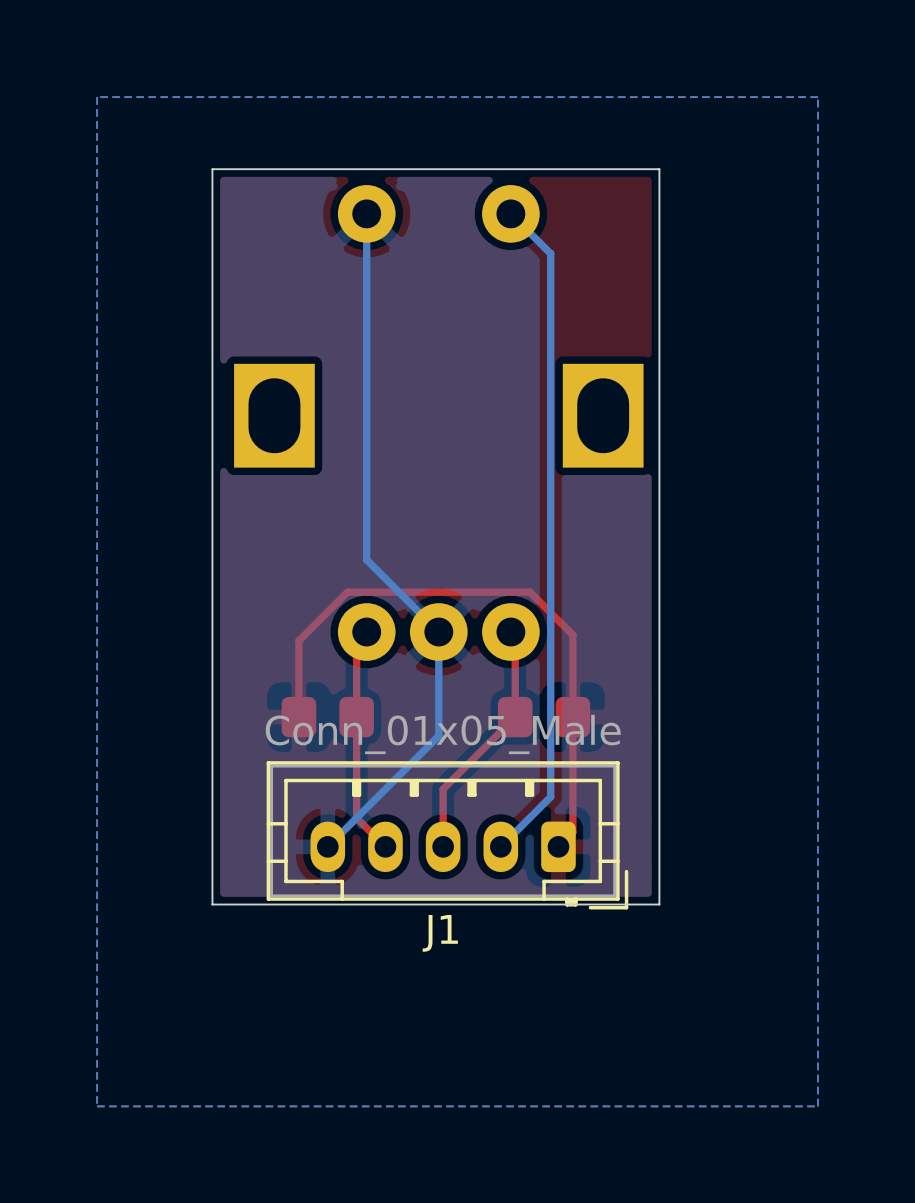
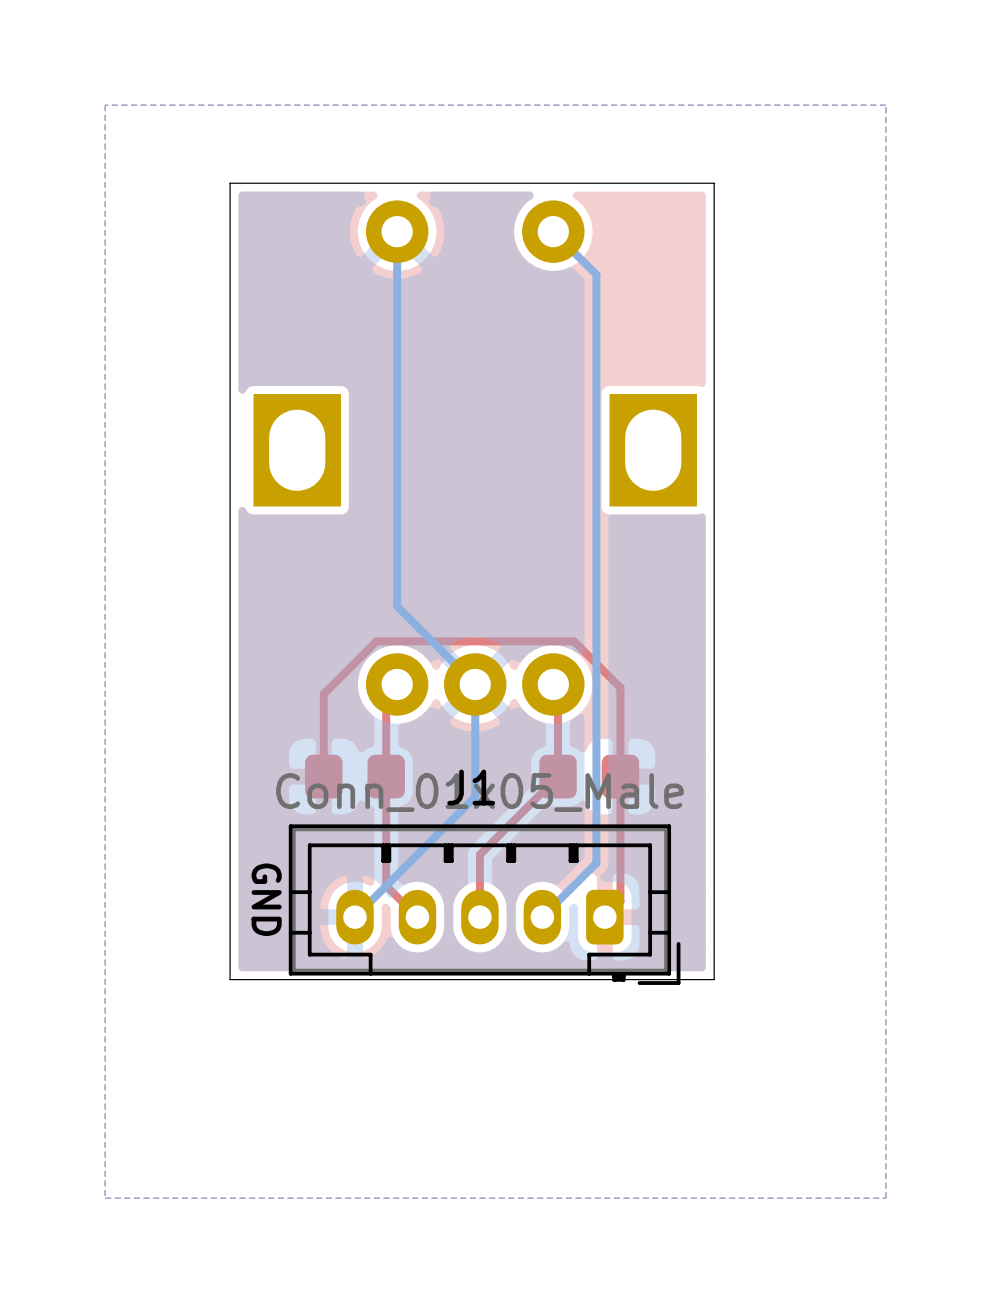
text: none -> GND (266, 899)
J1 name position: J1 (440, 933) -> J1 (471, 787)

